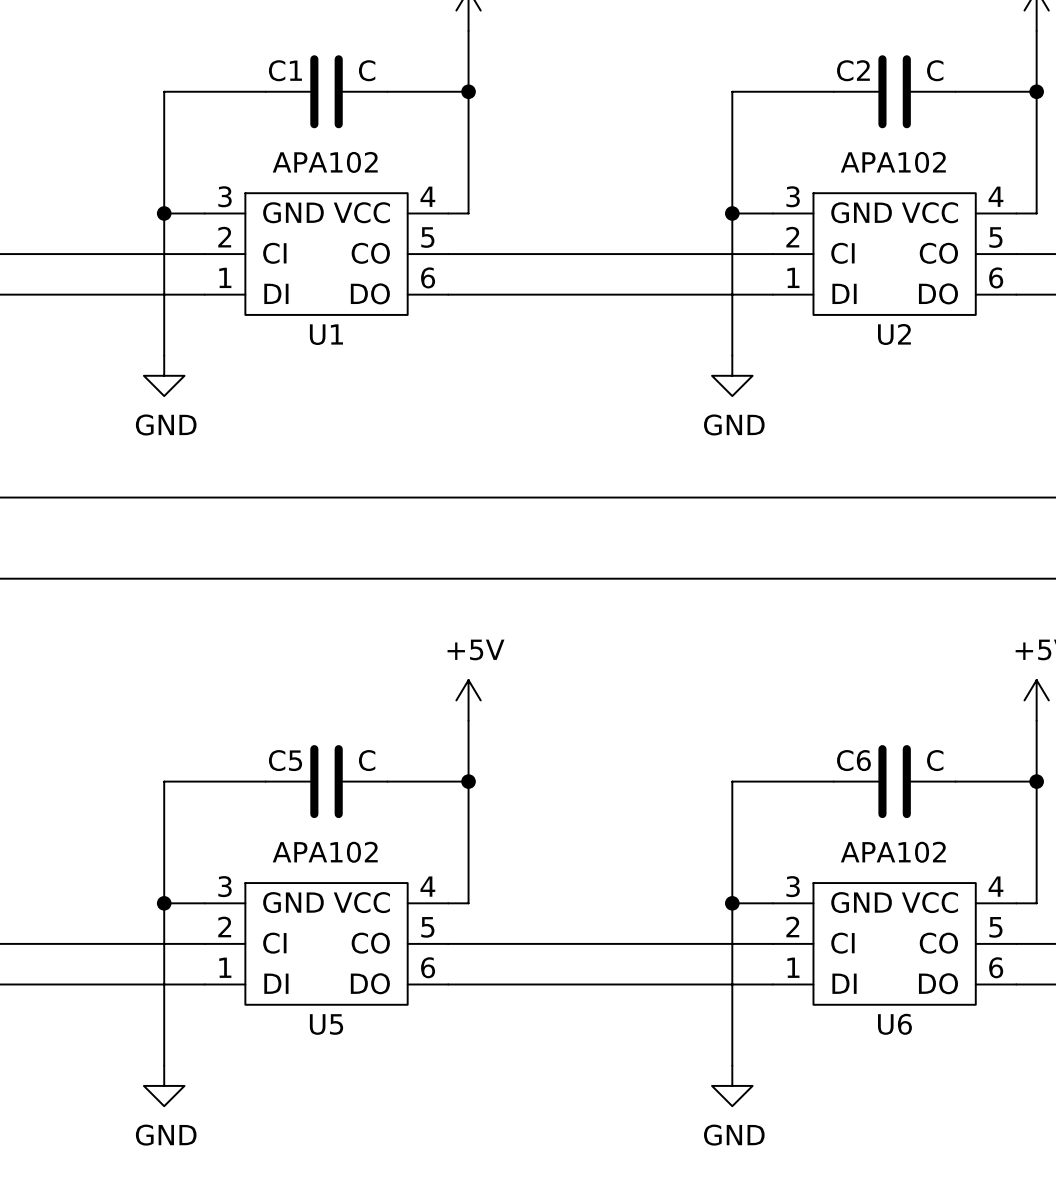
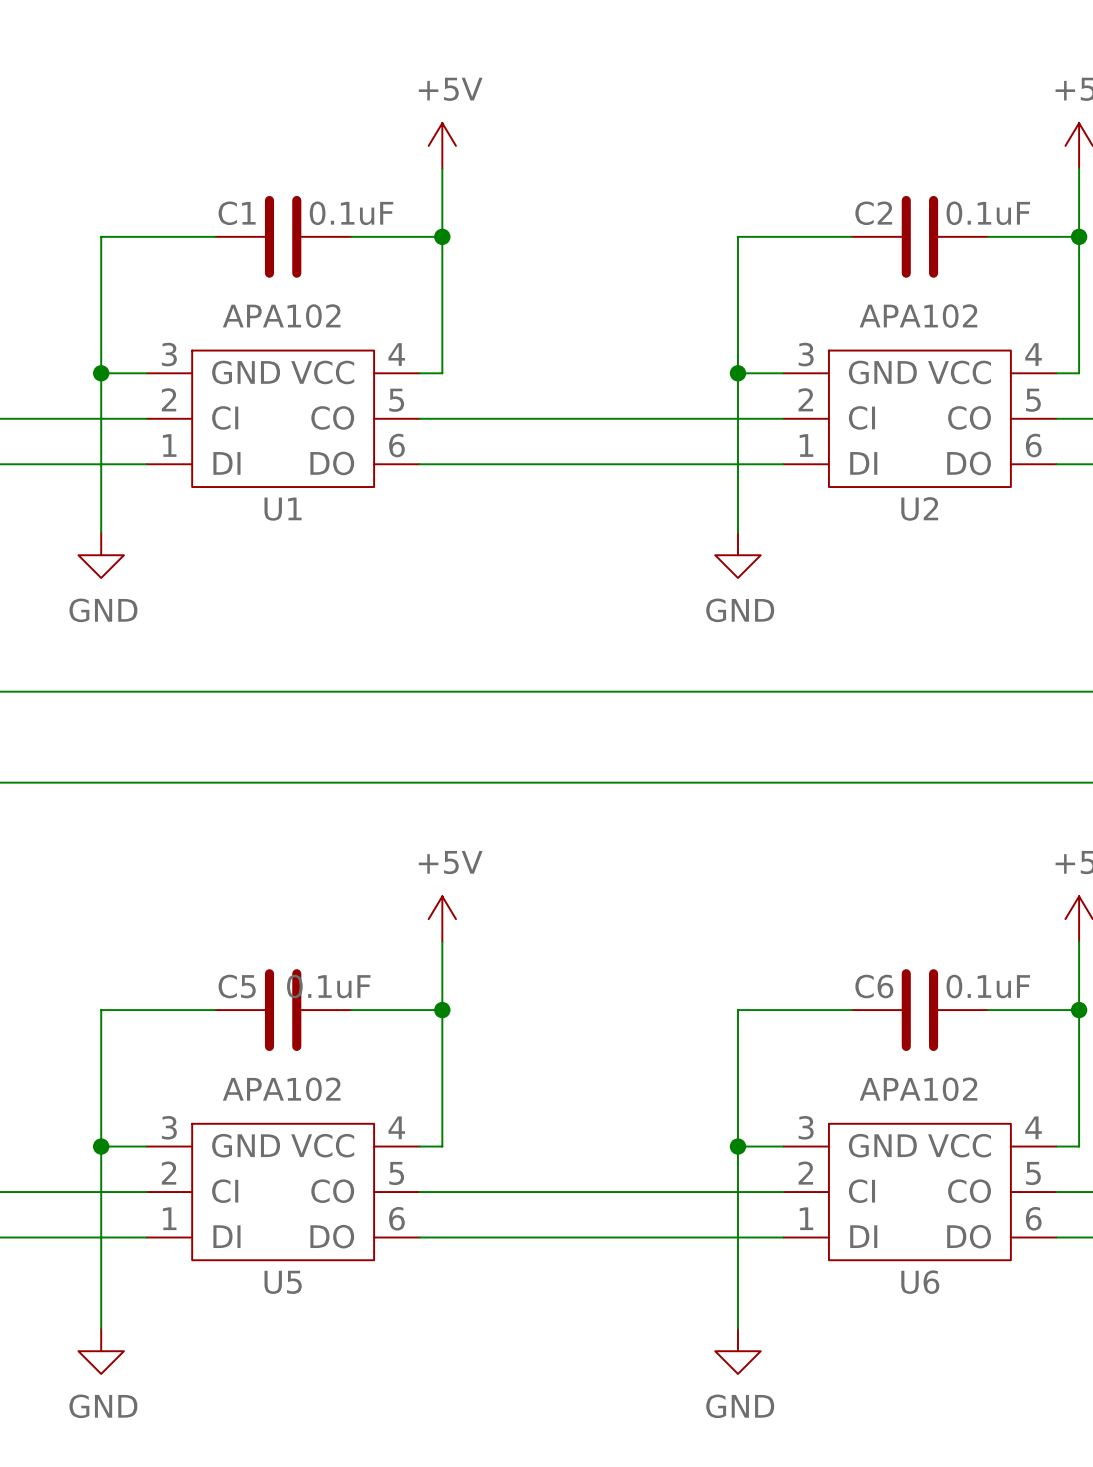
C1 value: C (367, 70) -> 0.1uF (351, 213)
C2 value: C (935, 70) -> 0.1uF (988, 213)
C5 value: C (367, 760) -> 0.1uF (328, 986)
C6 value: C (935, 760) -> 0.1uF (988, 986)

